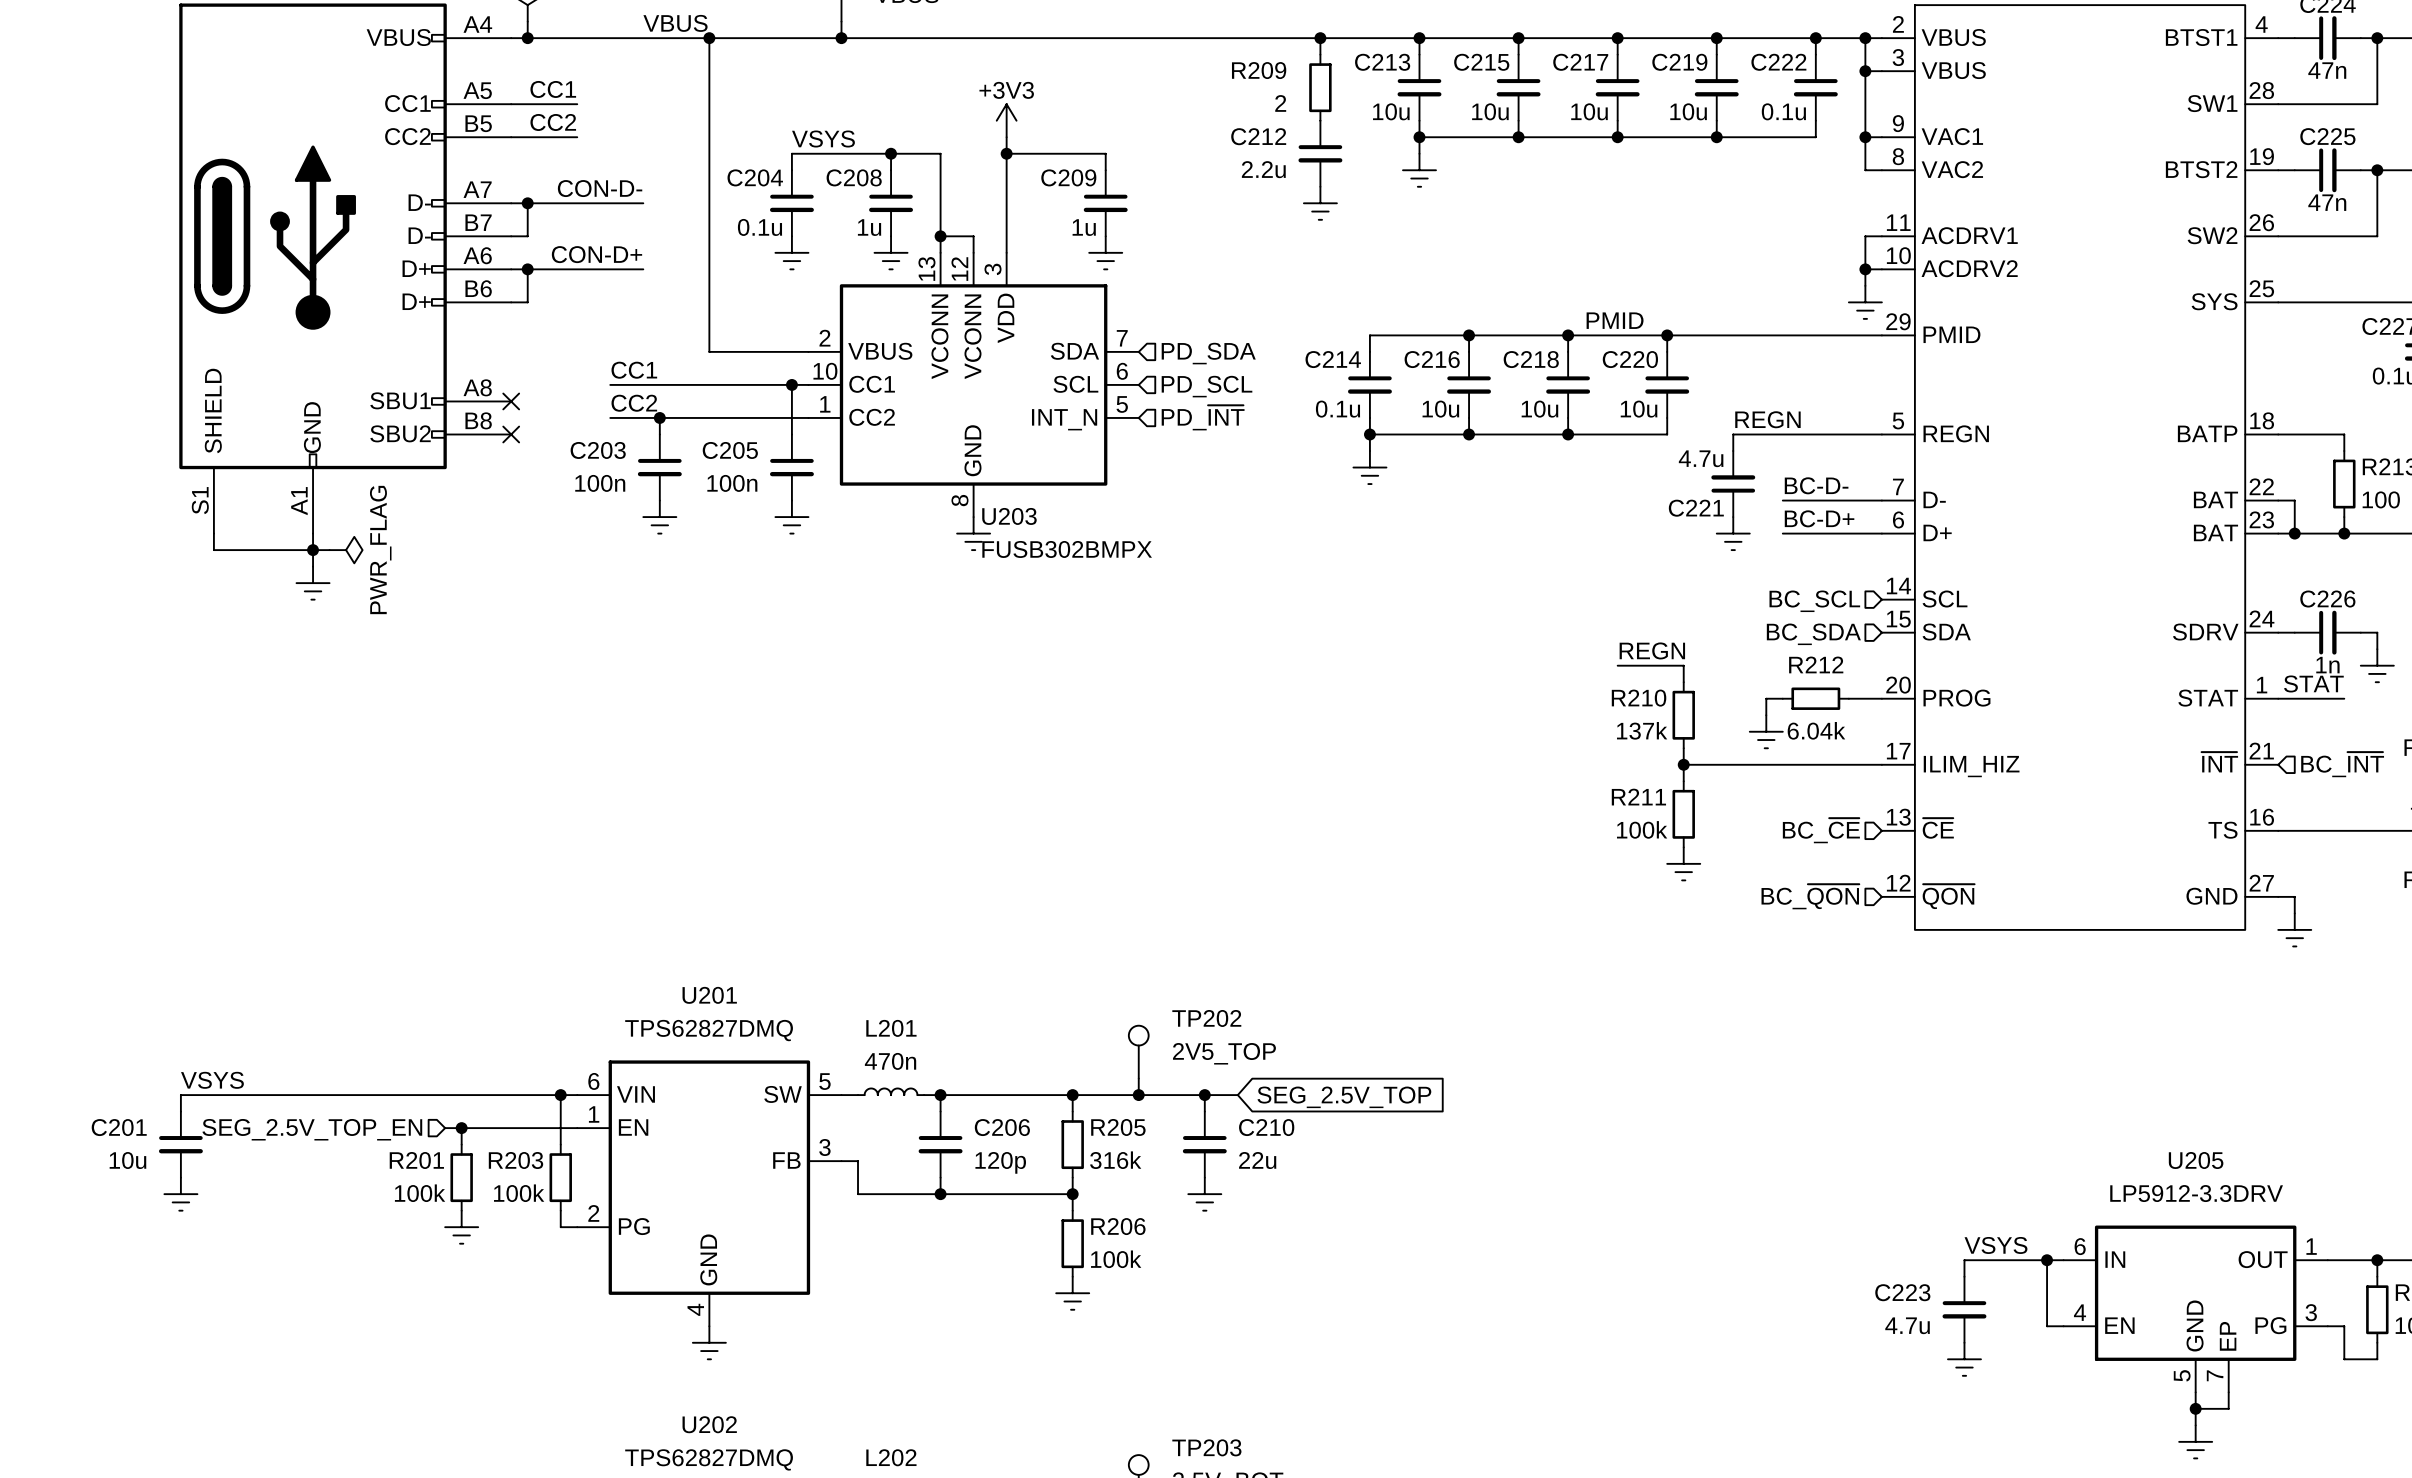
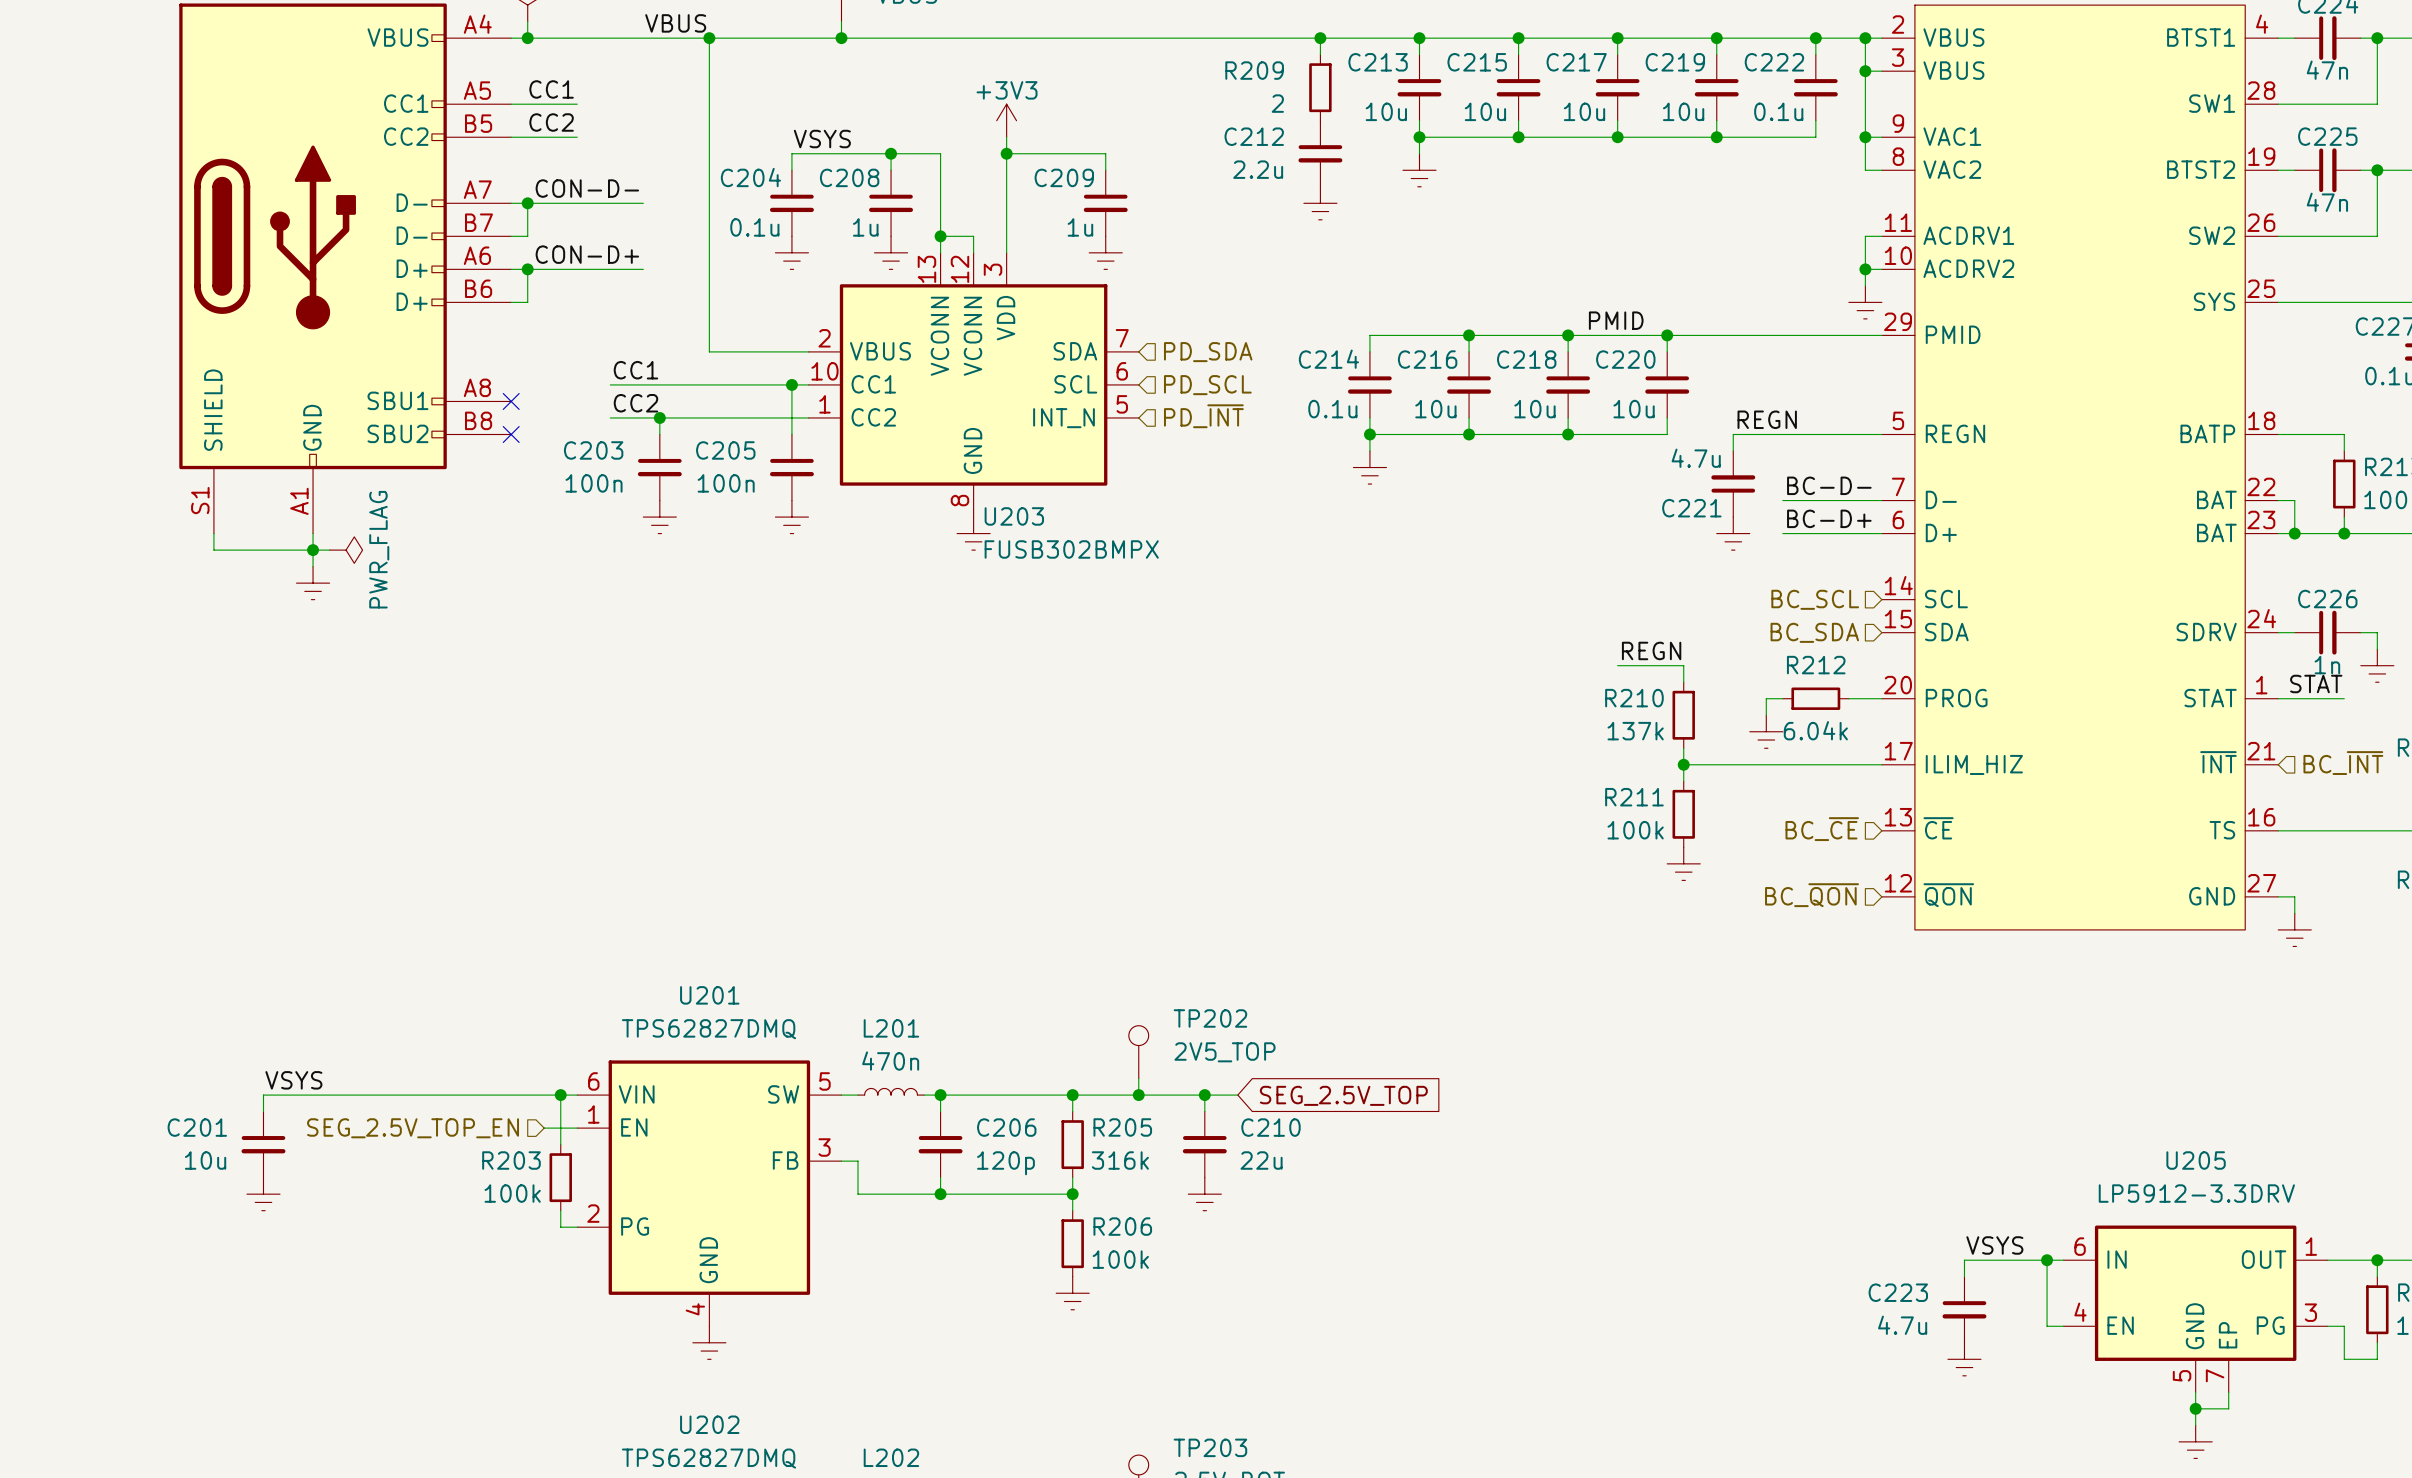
label position: VSYS (212, 1080) -> VSYS (293, 1080)
wire: (263, 1095) (180, 1095) (180, 1111) -> (263, 1095) (263, 1111)
wire: (445, 1128) (544, 1128) -> none
wire: (461, 1128) (461, 1144) -> none
junction: (461, 1128) -> none
hierarchical label position: SEG_2.5V_TOP_EN (312, 1129) -> SEG_2.5V_TOP_EN (413, 1128)
C201 position: (180, 1144) -> (263, 1144)
R201: 100k (461, 1177) -> none
power symbol position: (180, 1194) -> (263, 1194)
power symbol: (461, 1227) -> none

